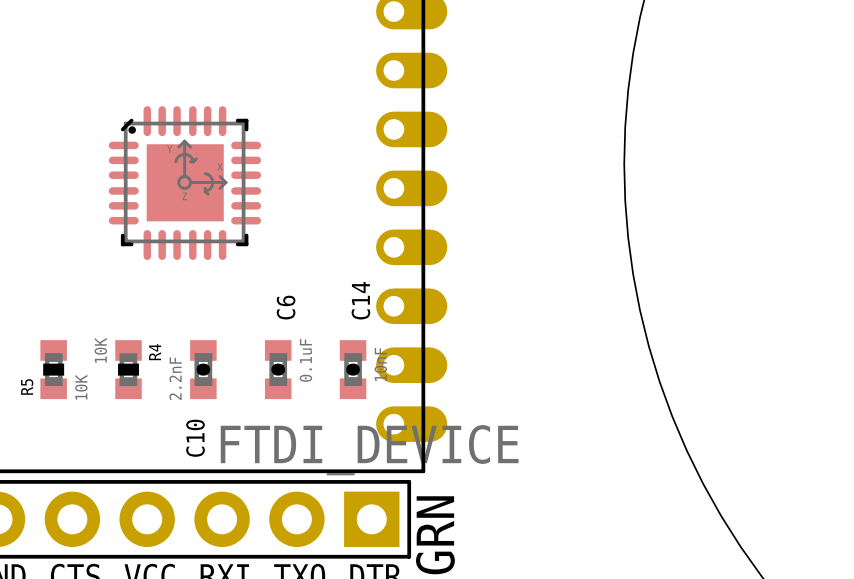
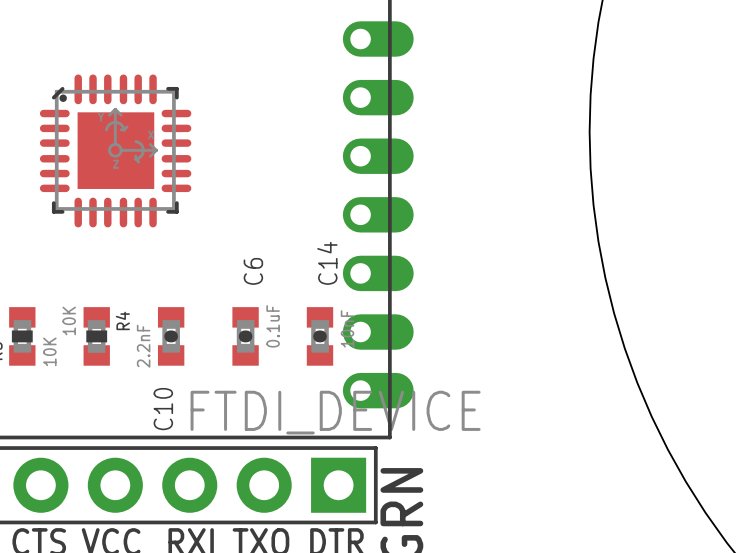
part position: (184, 183) -> (115, 150)

